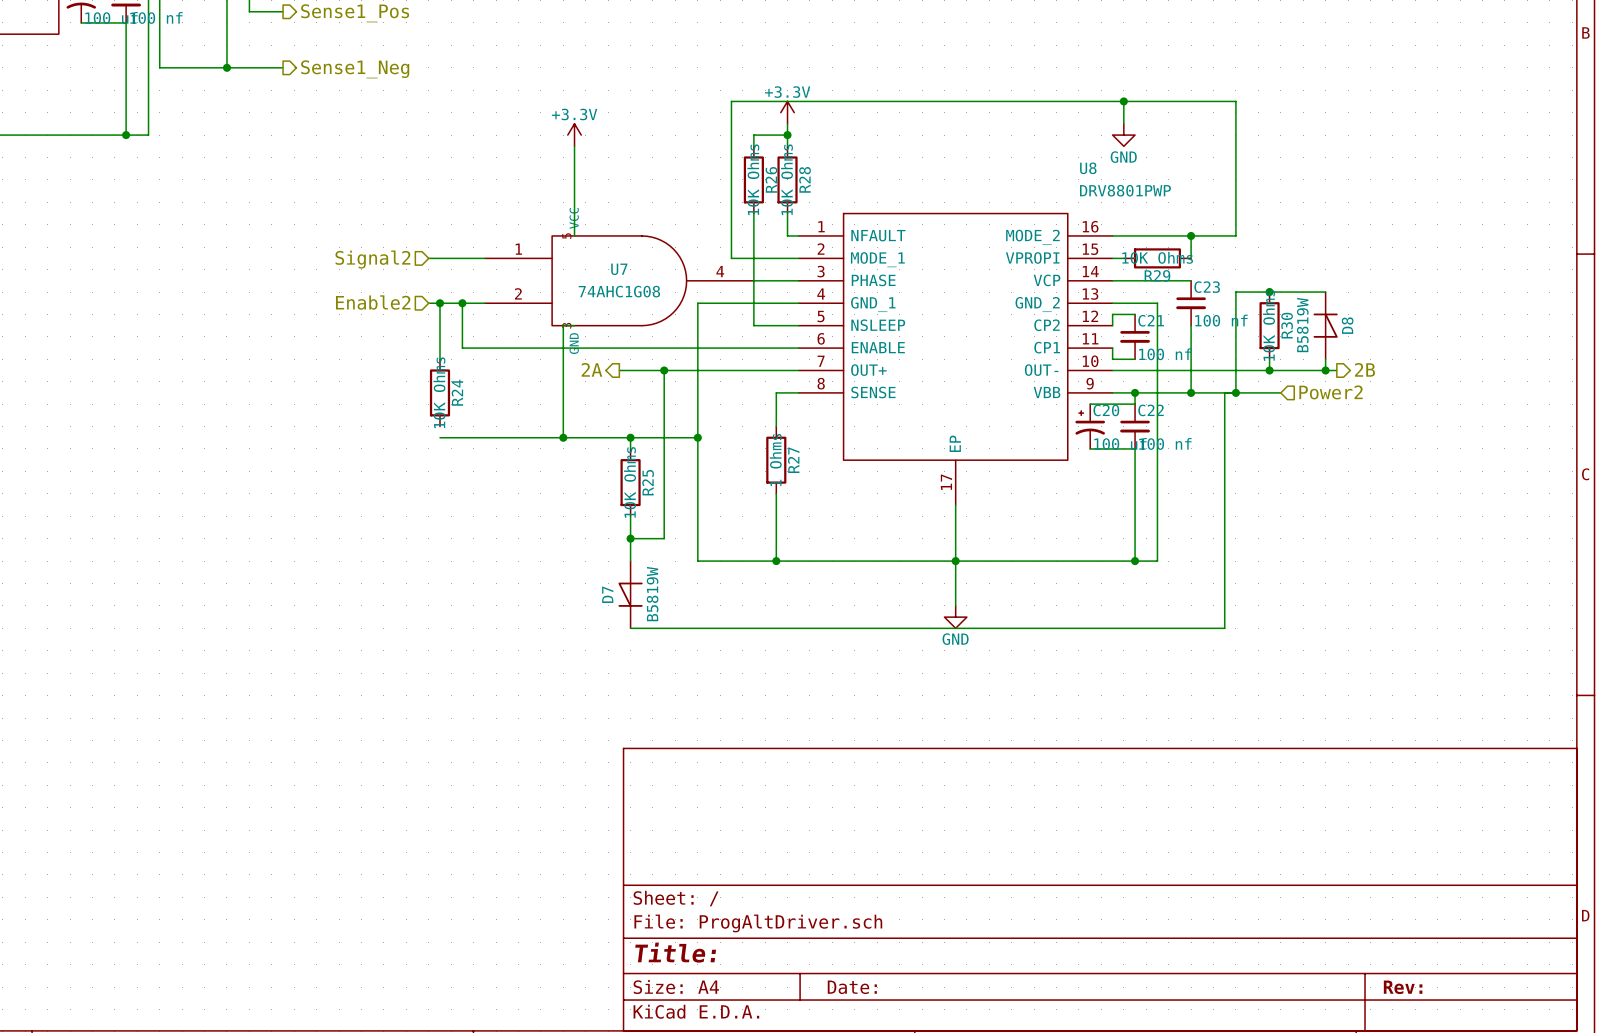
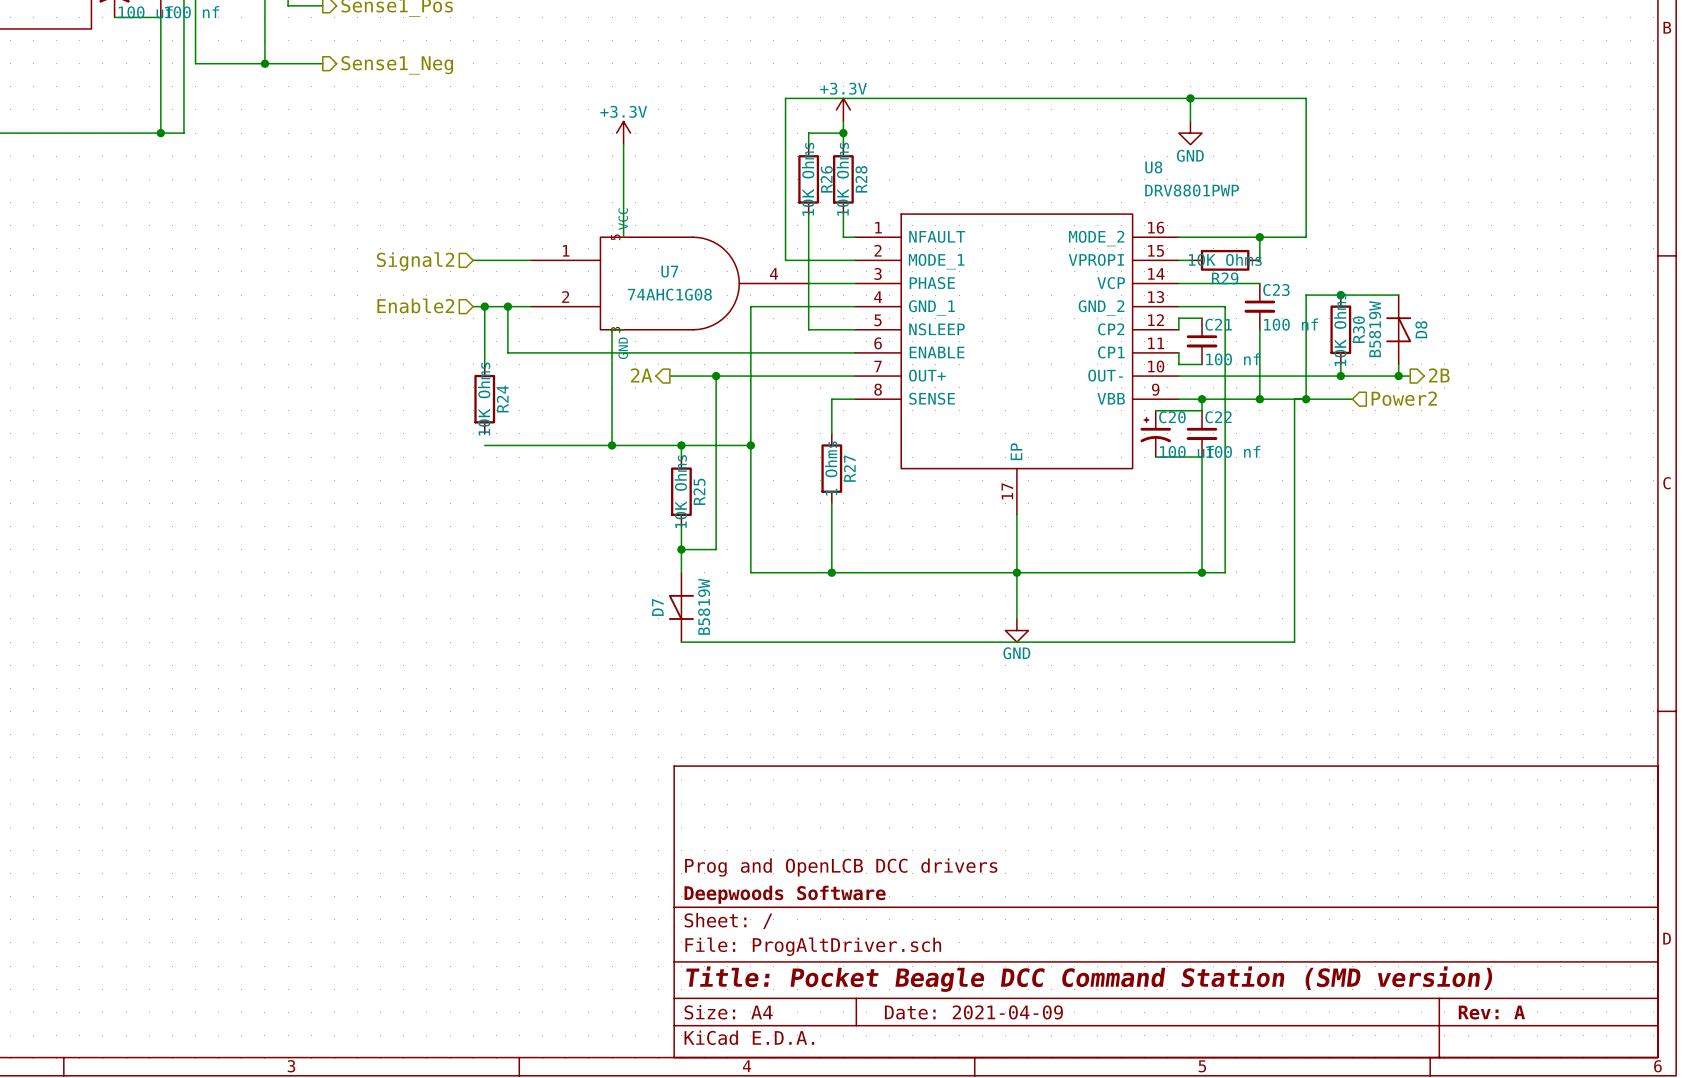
title block: none -> Prog and OpenLCB DCC drivers (841, 867)
title block: none -> Deepwoods Software (785, 894)
title block: Title: (675, 952) -> Title: Pocket Beagle DCC Command Station (SMD version) (1089, 979)
title block: Date: (852, 987) -> Date: 2021-04-09 (973, 1012)
title block: Rev: (1403, 987) -> Rev: A (1491, 1012)

